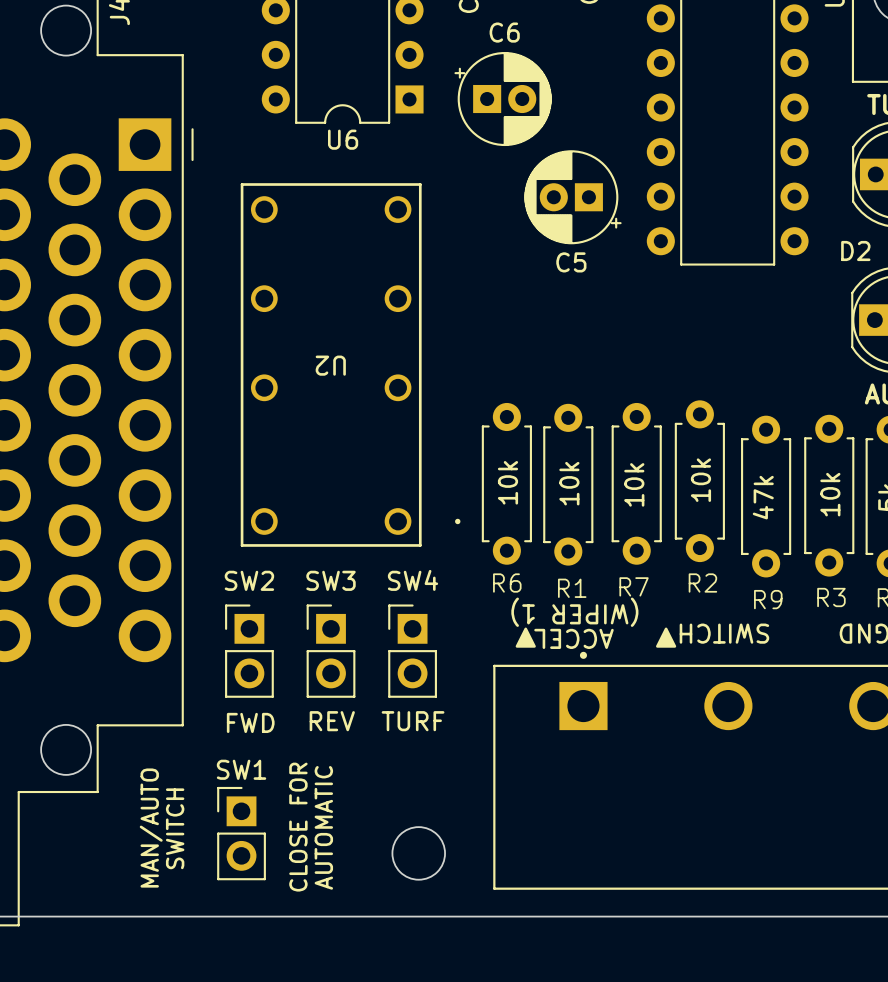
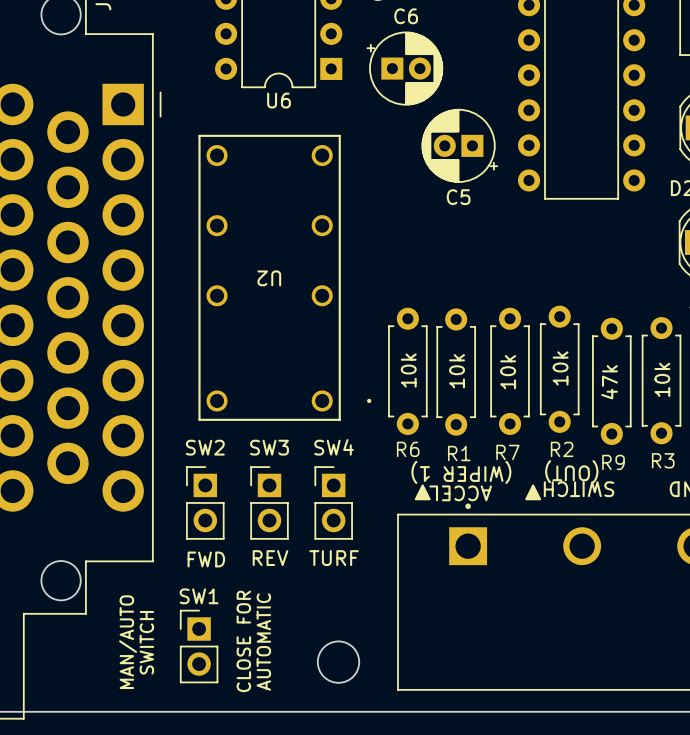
text: none -> (OUT) (571, 471)

